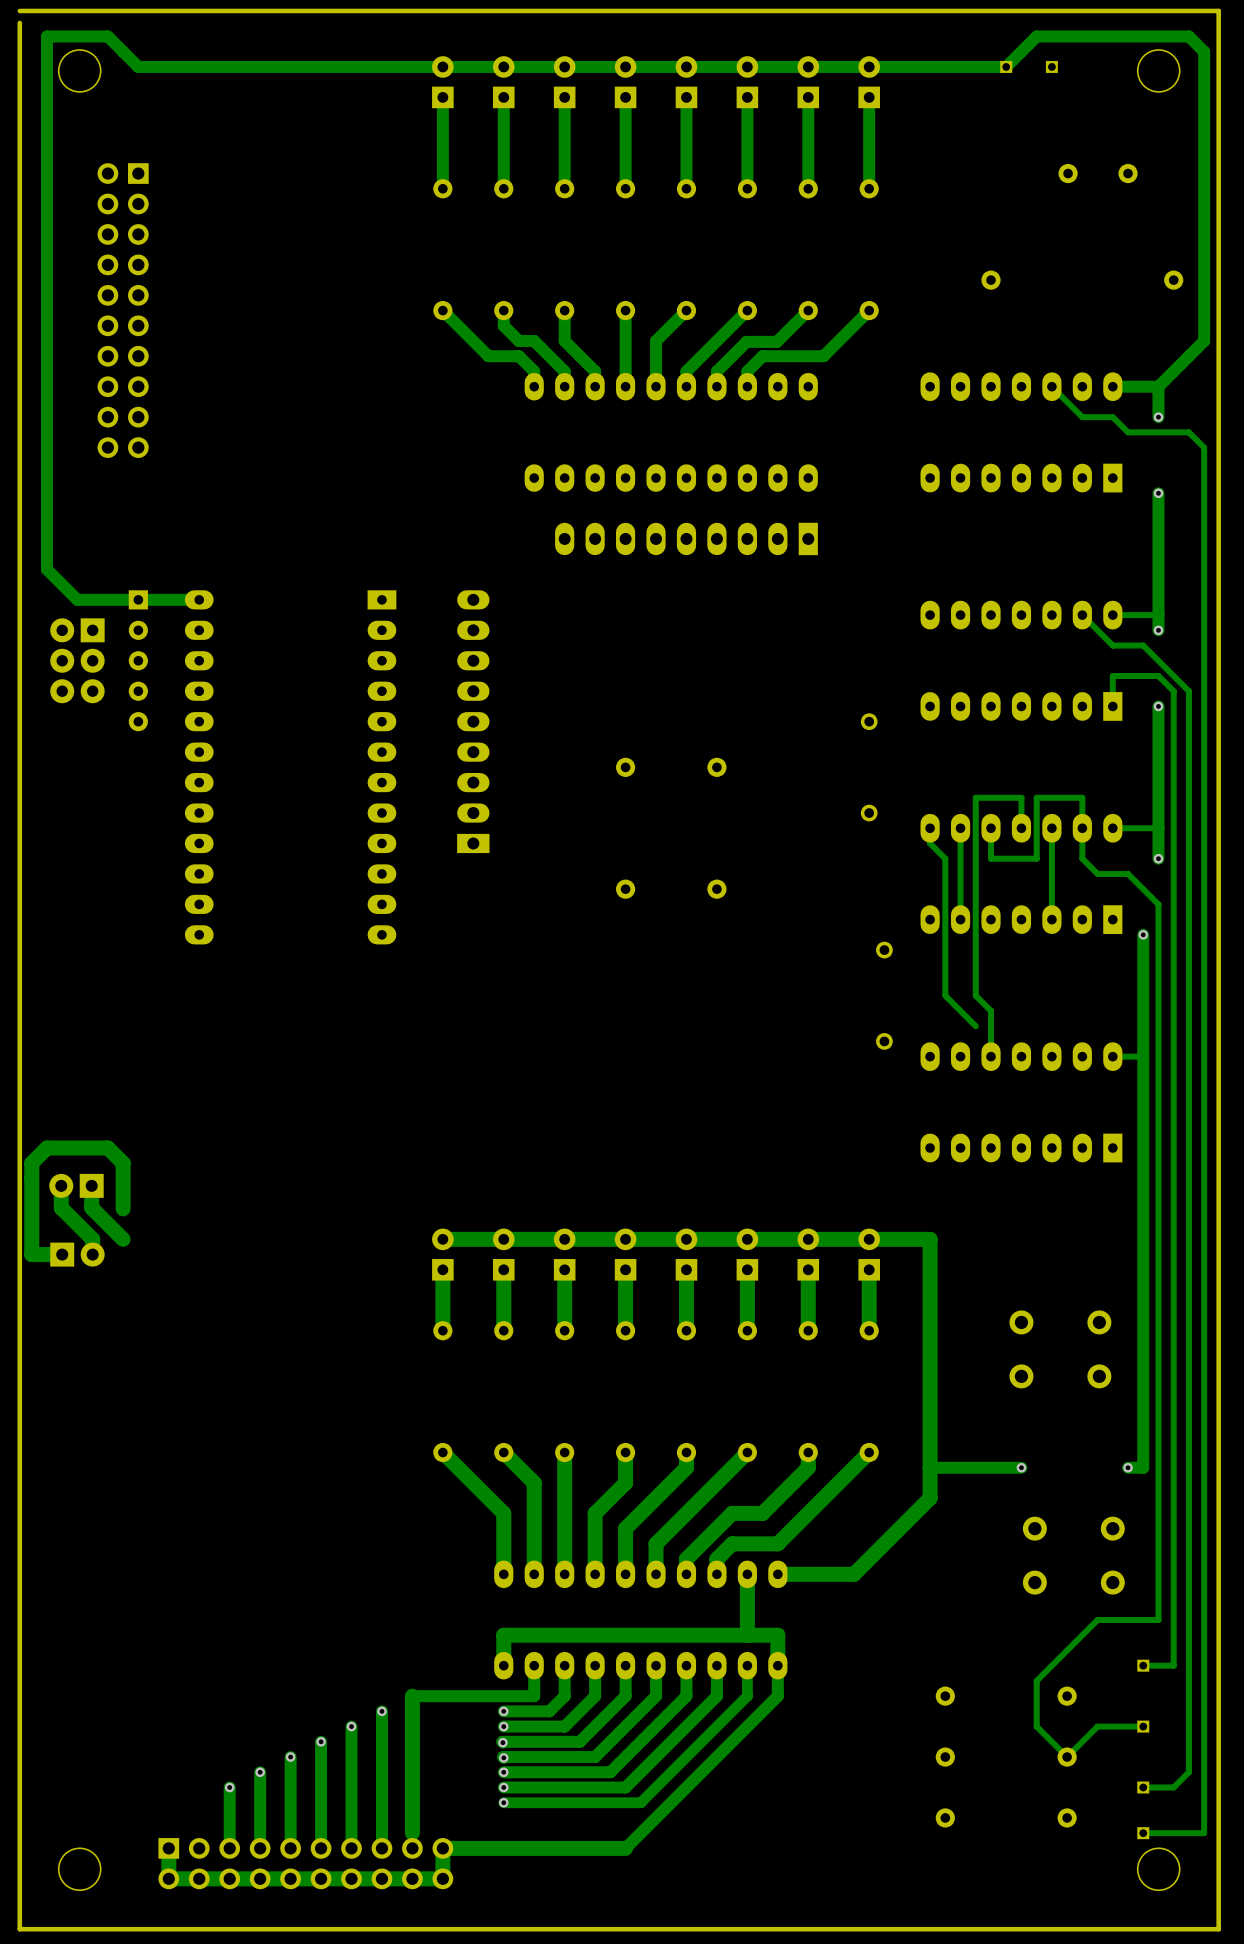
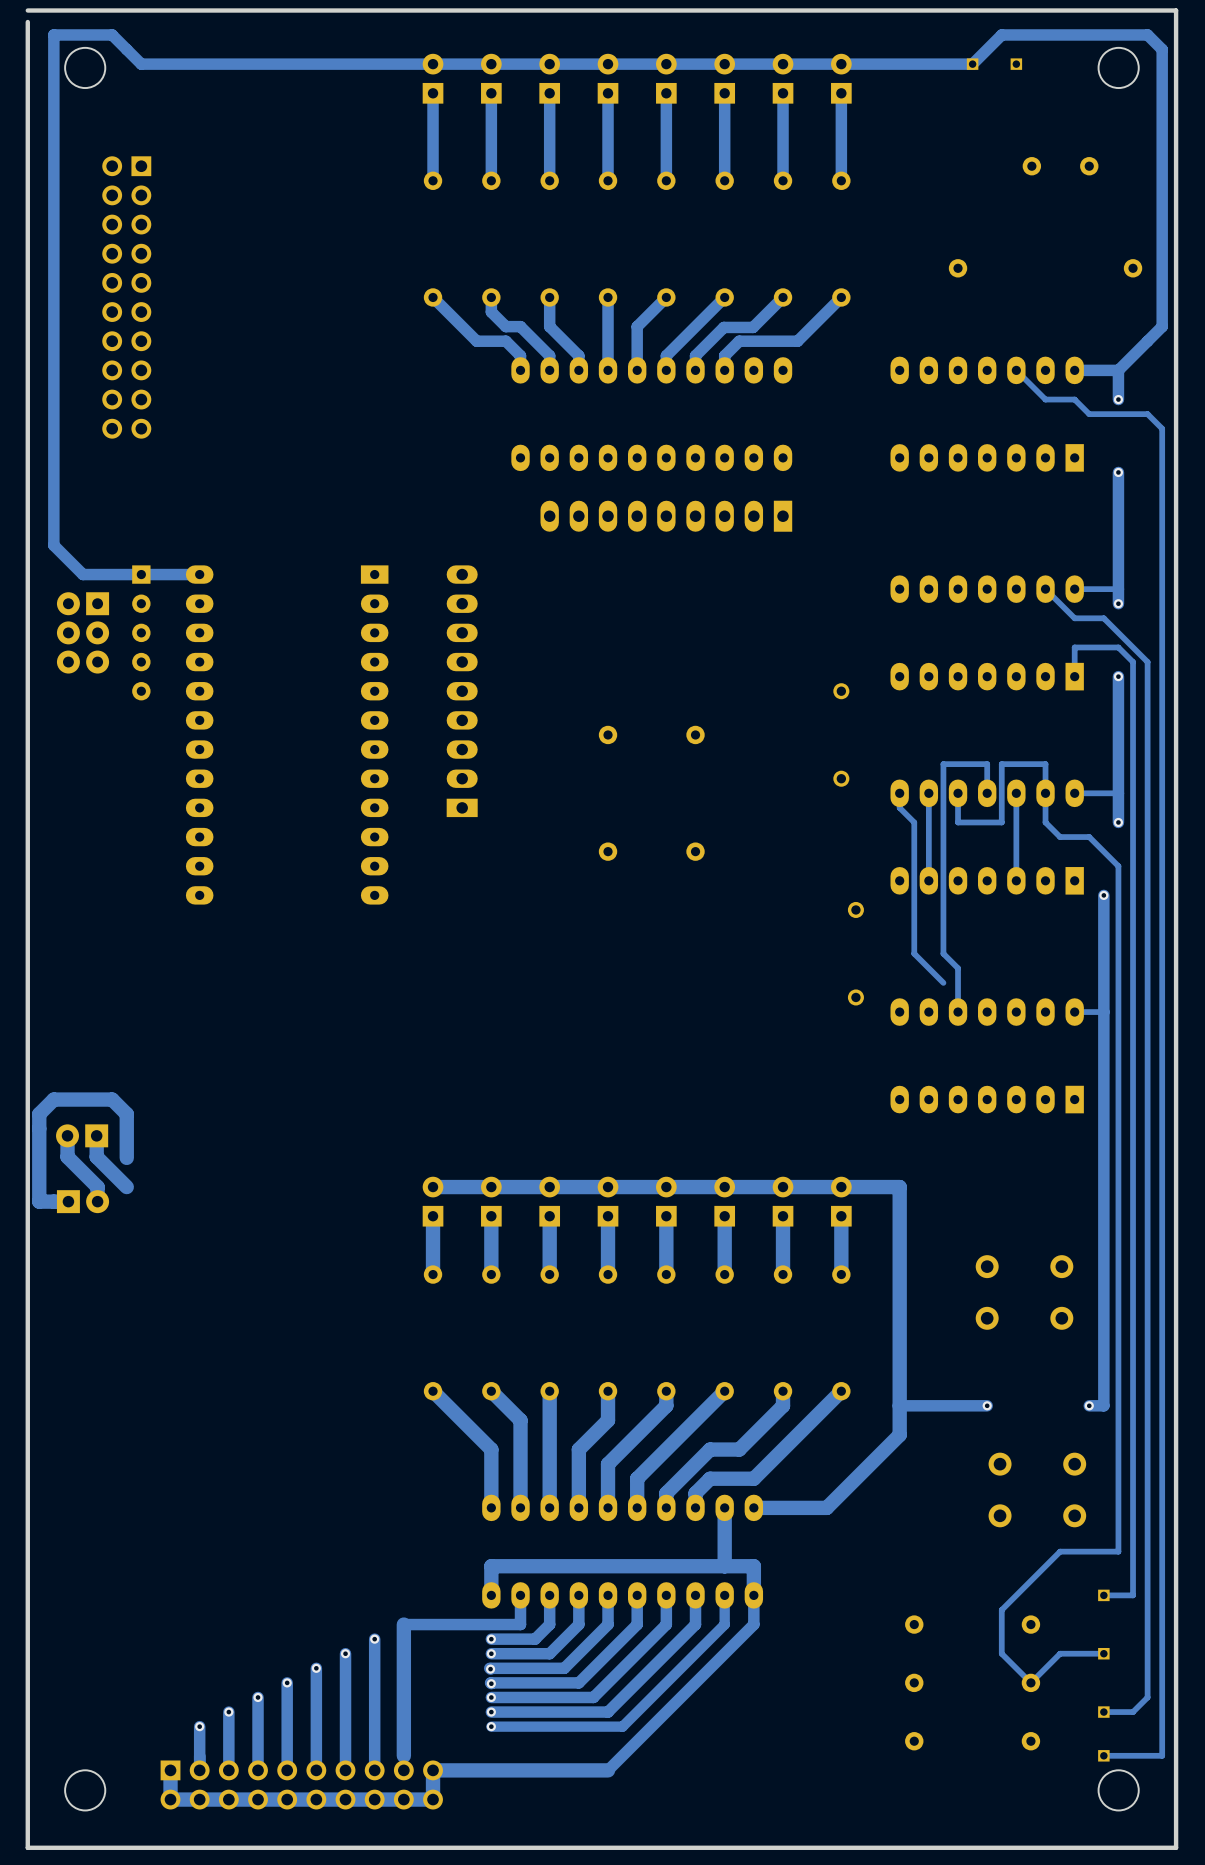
track: none -> (199, 1726) (199, 1770)
via: none -> (199, 1726)

